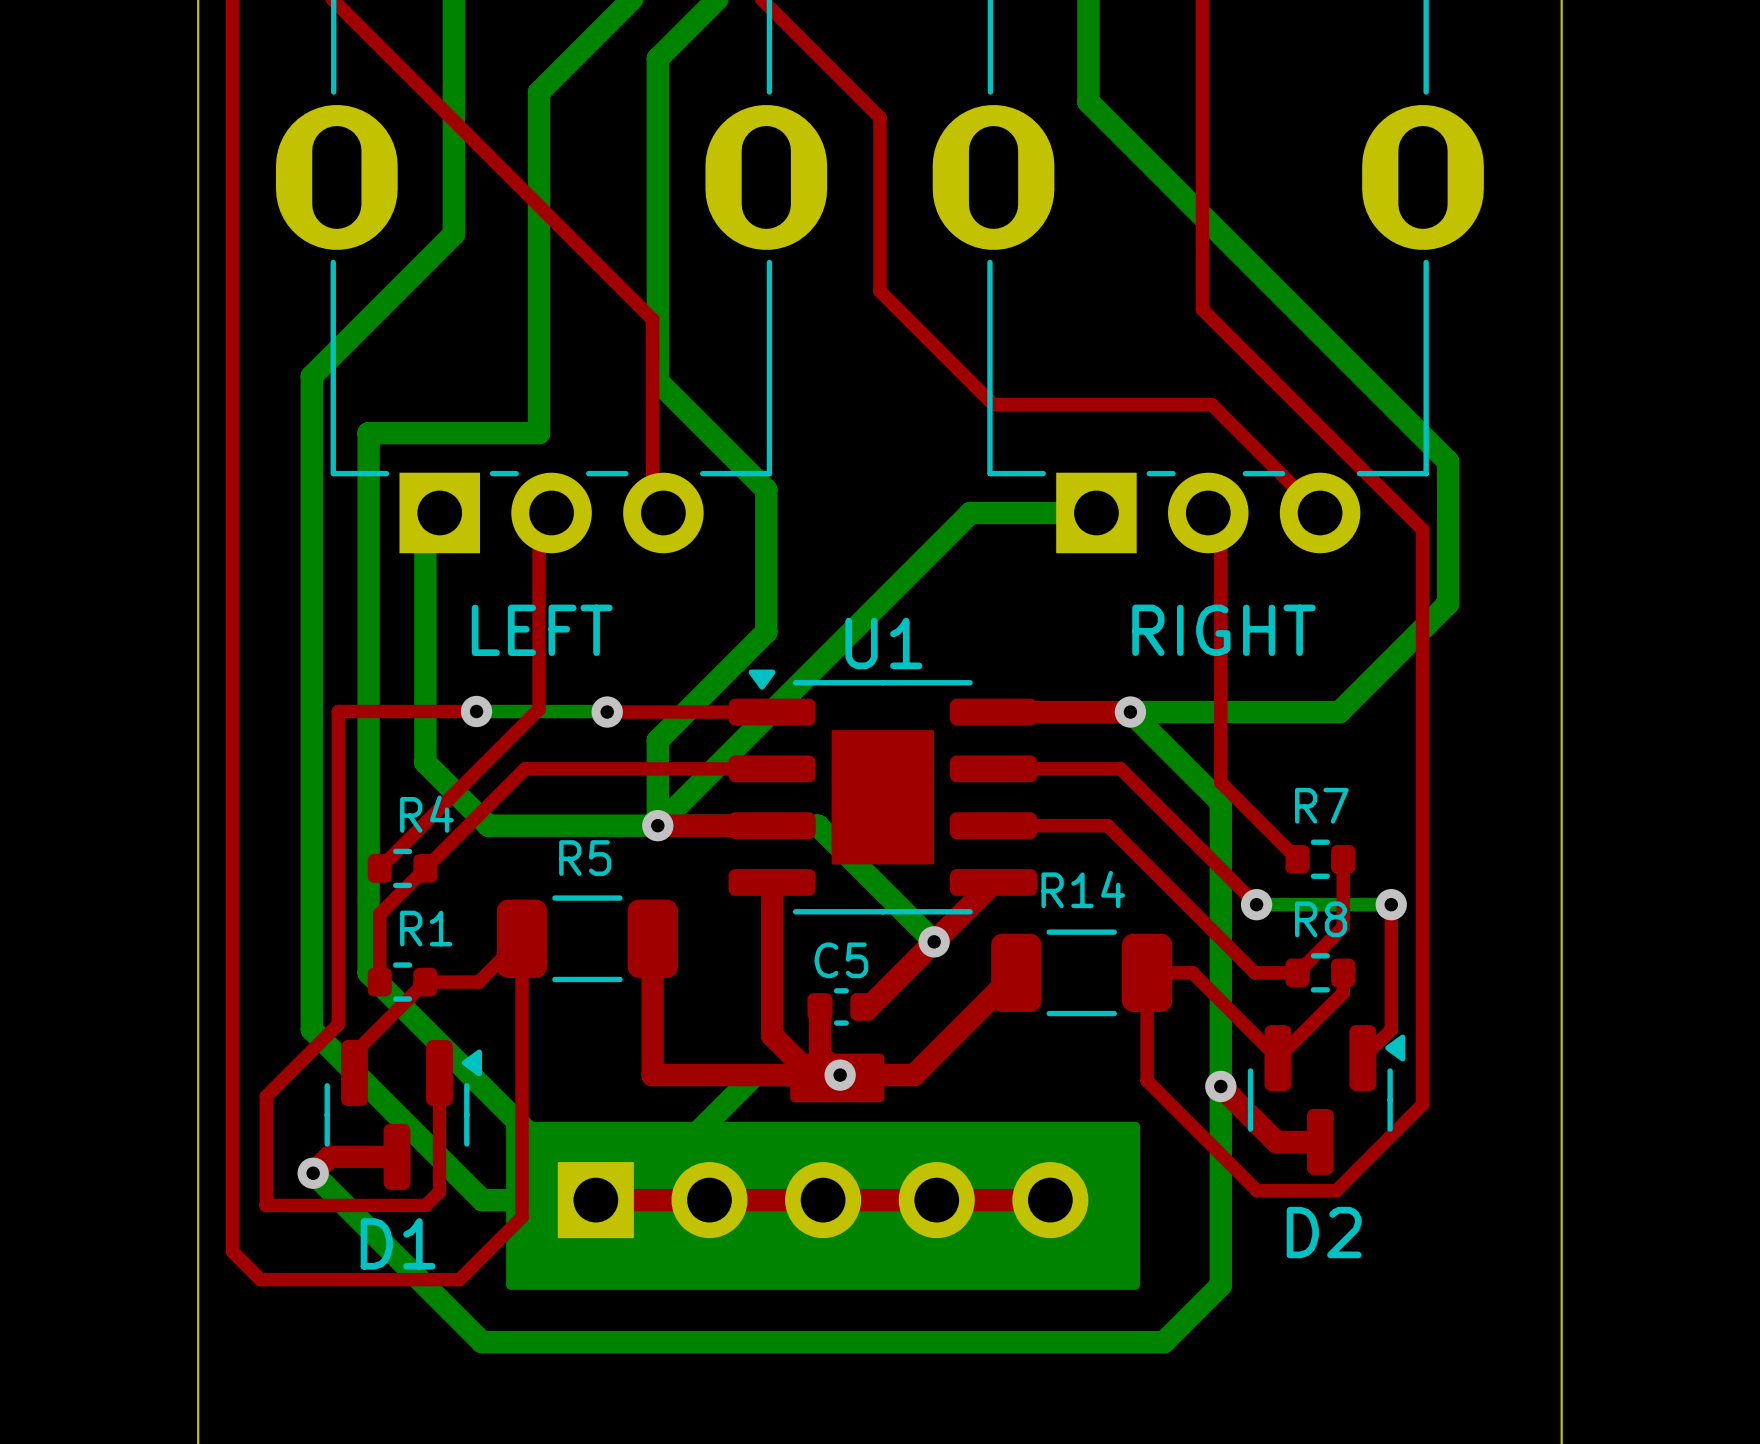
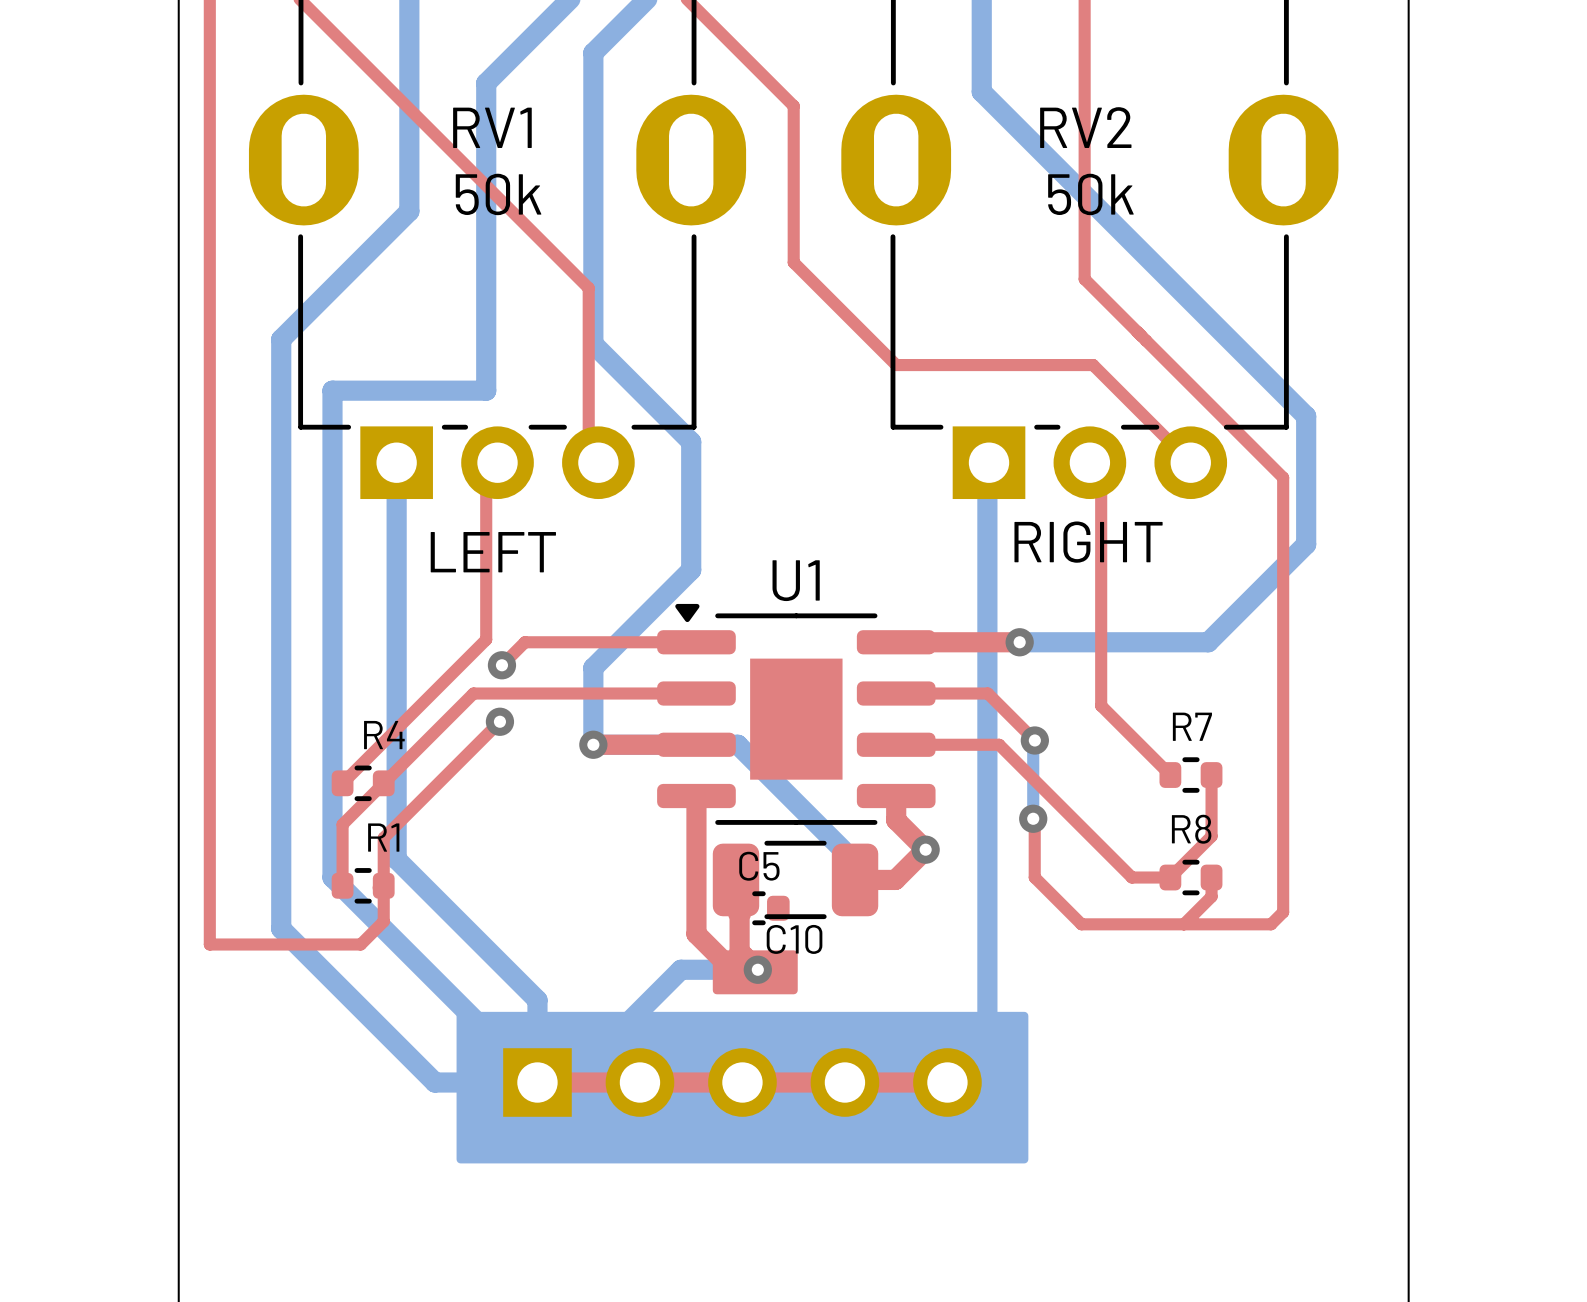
LEFT value: none -> 50k (498, 194)
RIGHT value: none -> 50k (1090, 194)
bottom track: (439, 512) (425, 527) (425, 762) (488, 825) (657, 825) (970, 512) (1096, 512) -> (396, 462) (396, 859) (537, 1000) (537, 1082)
bottom track: none -> (990, 462) (987, 465) (987, 1042) (947, 1082)
text: none -> RIGHT (1088, 542)
text: none -> LEFT (493, 552)
LEFT name: LEFT (542, 630) -> RV1 (492, 127)
RIGHT name: RIGHT (1224, 630) -> RV2 (1085, 127)
top track: (476, 711) (338, 711) (338, 1024) (266, 1096) (266, 1205) -> none
bottom track: (476, 711) (606, 711) -> none
via: (476, 711) -> none
top track: none -> (543, 642) (524, 642) (501, 665)
via: (607, 712) -> none
bottom track: (1130, 712) (1220, 802) (1220, 1285) (1163, 1342) (482, 1342) (313, 1173) -> none
via: none -> (501, 665)
top track: (1095, 768) (1120, 768) (1256, 904) -> (987, 693) (1034, 740)
via: none -> (499, 721)
bottom track: none -> (1034, 740) (1033, 742) (1033, 818)
via: none -> (1034, 740)
top track: (993, 882) (869, 1006) (862, 1006) -> (896, 796) (896, 820) (925, 849) (895, 879) (863, 879)
bottom track: (1256, 904) (1391, 904) -> none
via: (1256, 904) -> none
top track: (1391, 904) (1391, 1029) (1362, 1058) -> none
via: (1391, 904) -> none
top track: none -> (1033, 818) (1034, 877) (1081, 924) (1271, 924) (1283, 912)
via: none -> (1033, 818)
R5: (587, 938) -> none
top track: (652, 938) (652, 1075) (811, 1075) -> none
via position: (934, 941) -> (925, 849)
top track: (1016, 972) (914, 1075) (840, 1075) -> none
R14: (1081, 972) -> none
C10: none -> (795, 879)
top track: (1343, 992) (1277, 1058) (1192, 972) (1147, 972) (1147, 1080) (1256, 1190) (1336, 1190) (1422, 1104) (1422, 1011) -> (1211, 895) (1183, 924)
top track: (232, 1047) (232, 1251) (260, 1279) (459, 1279) (522, 1217) (522, 938) (478, 982) (425, 982) (354, 1052) (354, 1072) -> (209, 944) (360, 944) (383, 921) (383, 837) (499, 721)
top track: (439, 1072) (439, 1191) (425, 1205) (266, 1205) -> none
top track: (1220, 1086) (1276, 1141) (1320, 1141) -> none
via: (1220, 1086) -> none
D2: (1326, 1100) -> none
D1: (403, 1114) -> none
top track: (397, 1156) (329, 1156) (313, 1173) -> none
via: (313, 1173) -> none

